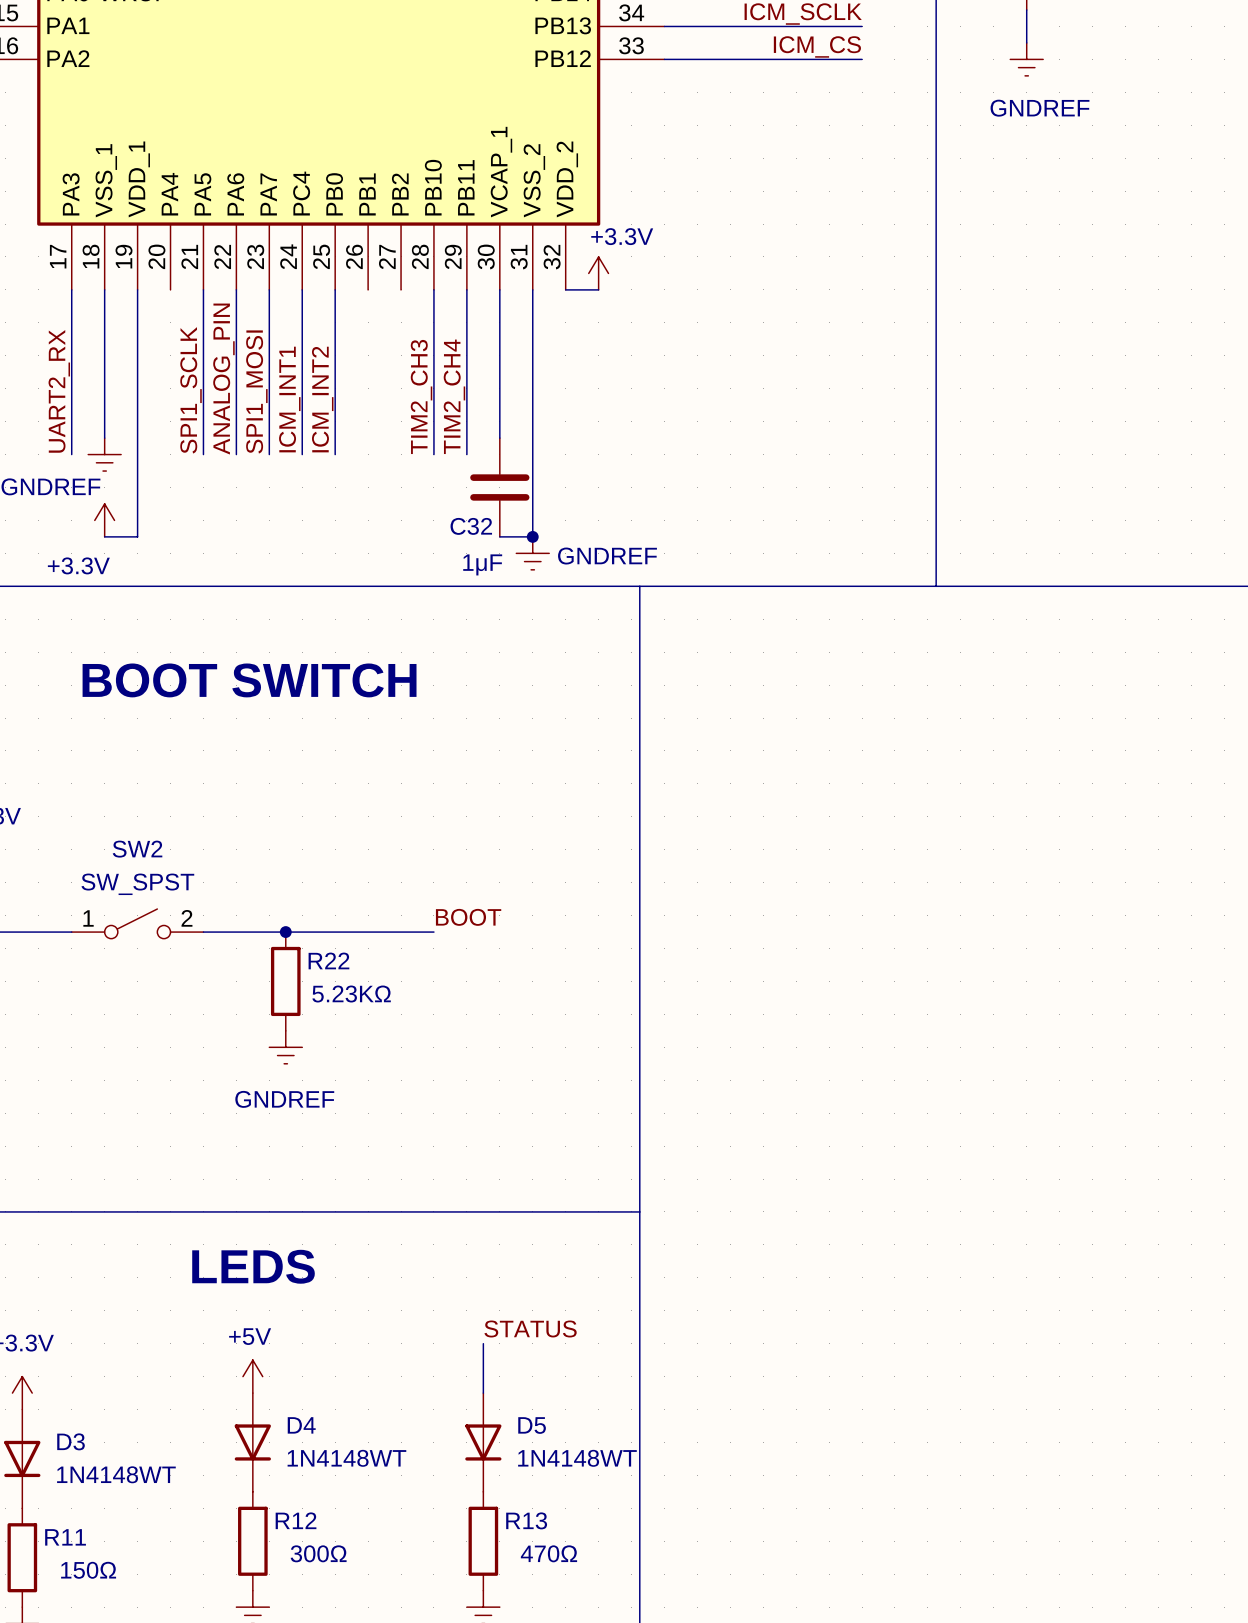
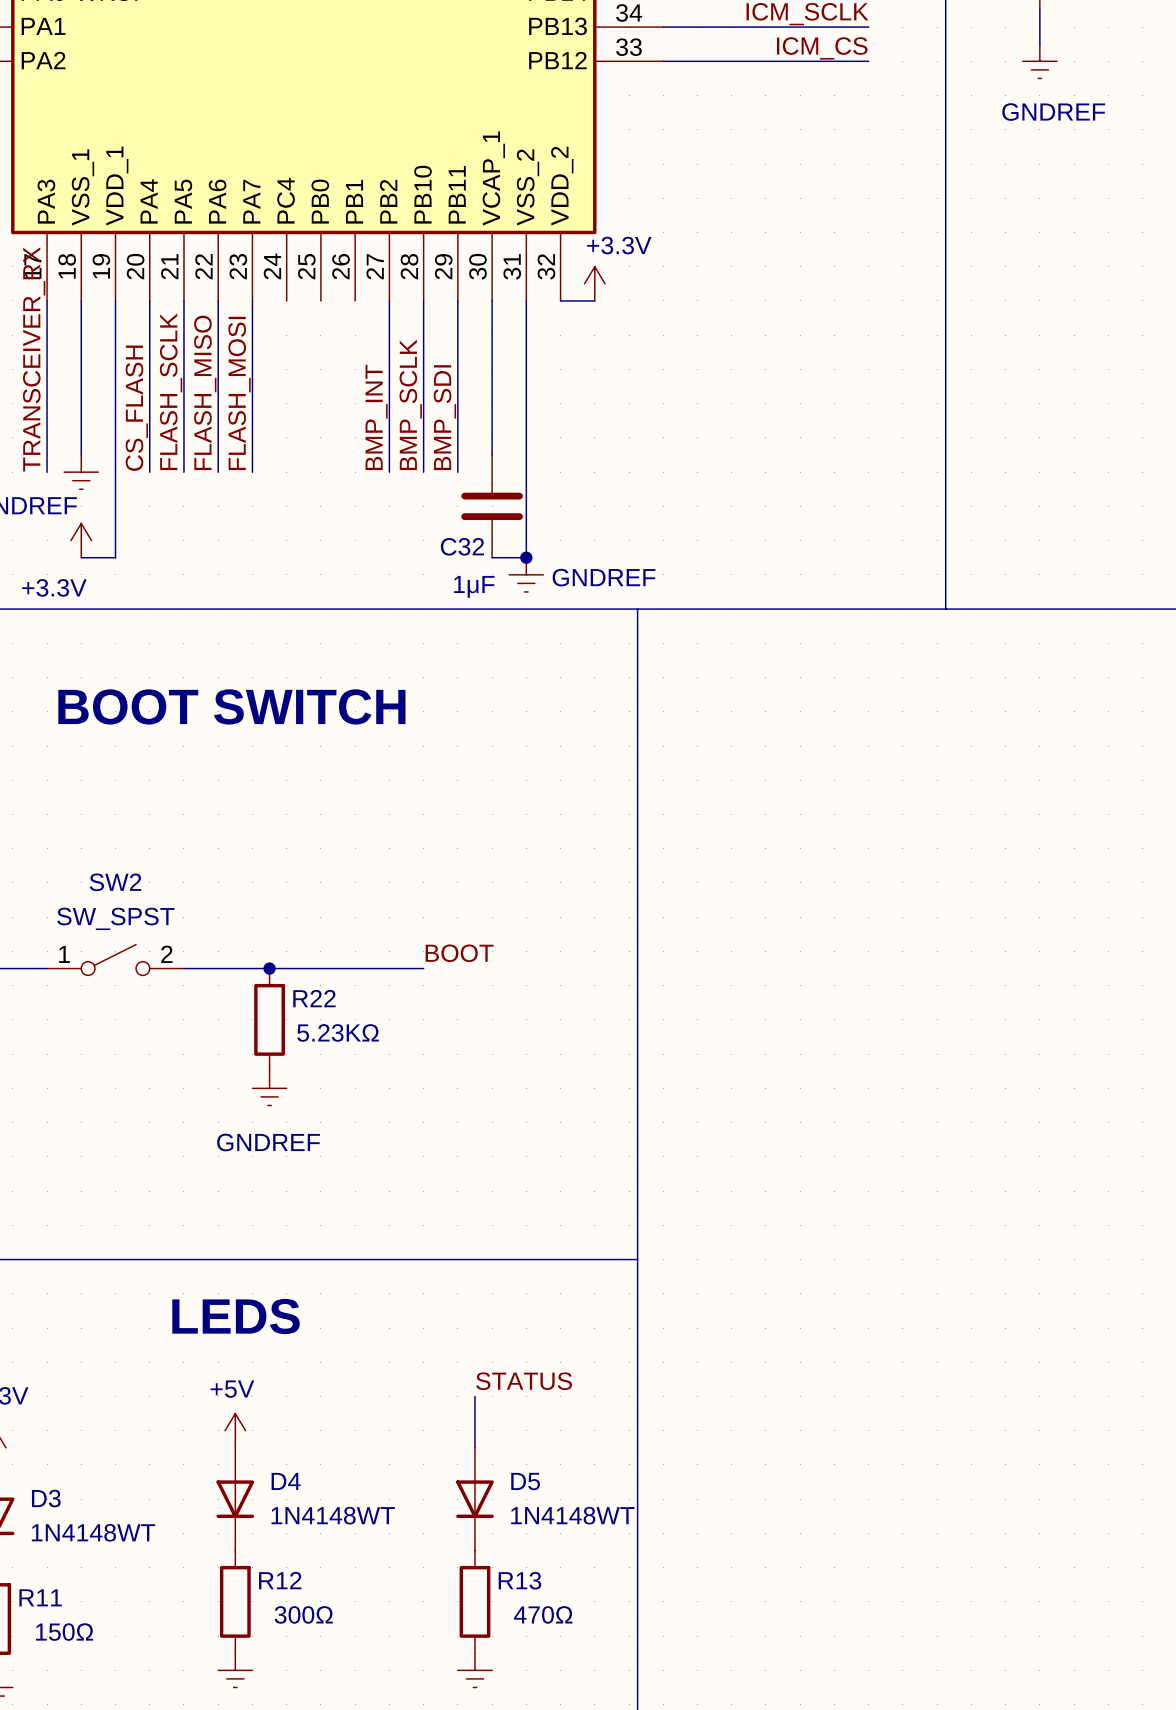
wire: (302, 289) (302, 454) -> (149, 300) (149, 472)
wire: (335, 289) (335, 454) -> (389, 300) (389, 472)
label: ANALOG_PIN (223, 379) -> FLASH_MISO (205, 392)
label: SPI1_SCLK (191, 390) -> FLASH_SCLK (171, 391)
label: UART2_RX (59, 391) -> TRANSCEIVER_RX (34, 359)
label: SPI1_MOSI (256, 391) -> FLASH_MOSI (239, 393)
label: none -> CS_FLASH (136, 408)
label: TIM2_CH3 (421, 396) -> BMP_SCLK (410, 404)
label: TIM2_CH4 (454, 396) -> BMP_SDI (444, 417)
label: ICM_INT1 (289, 399) -> none
label: ICM_INT2 (322, 399) -> none
label: none -> BMP_INT (376, 417)

